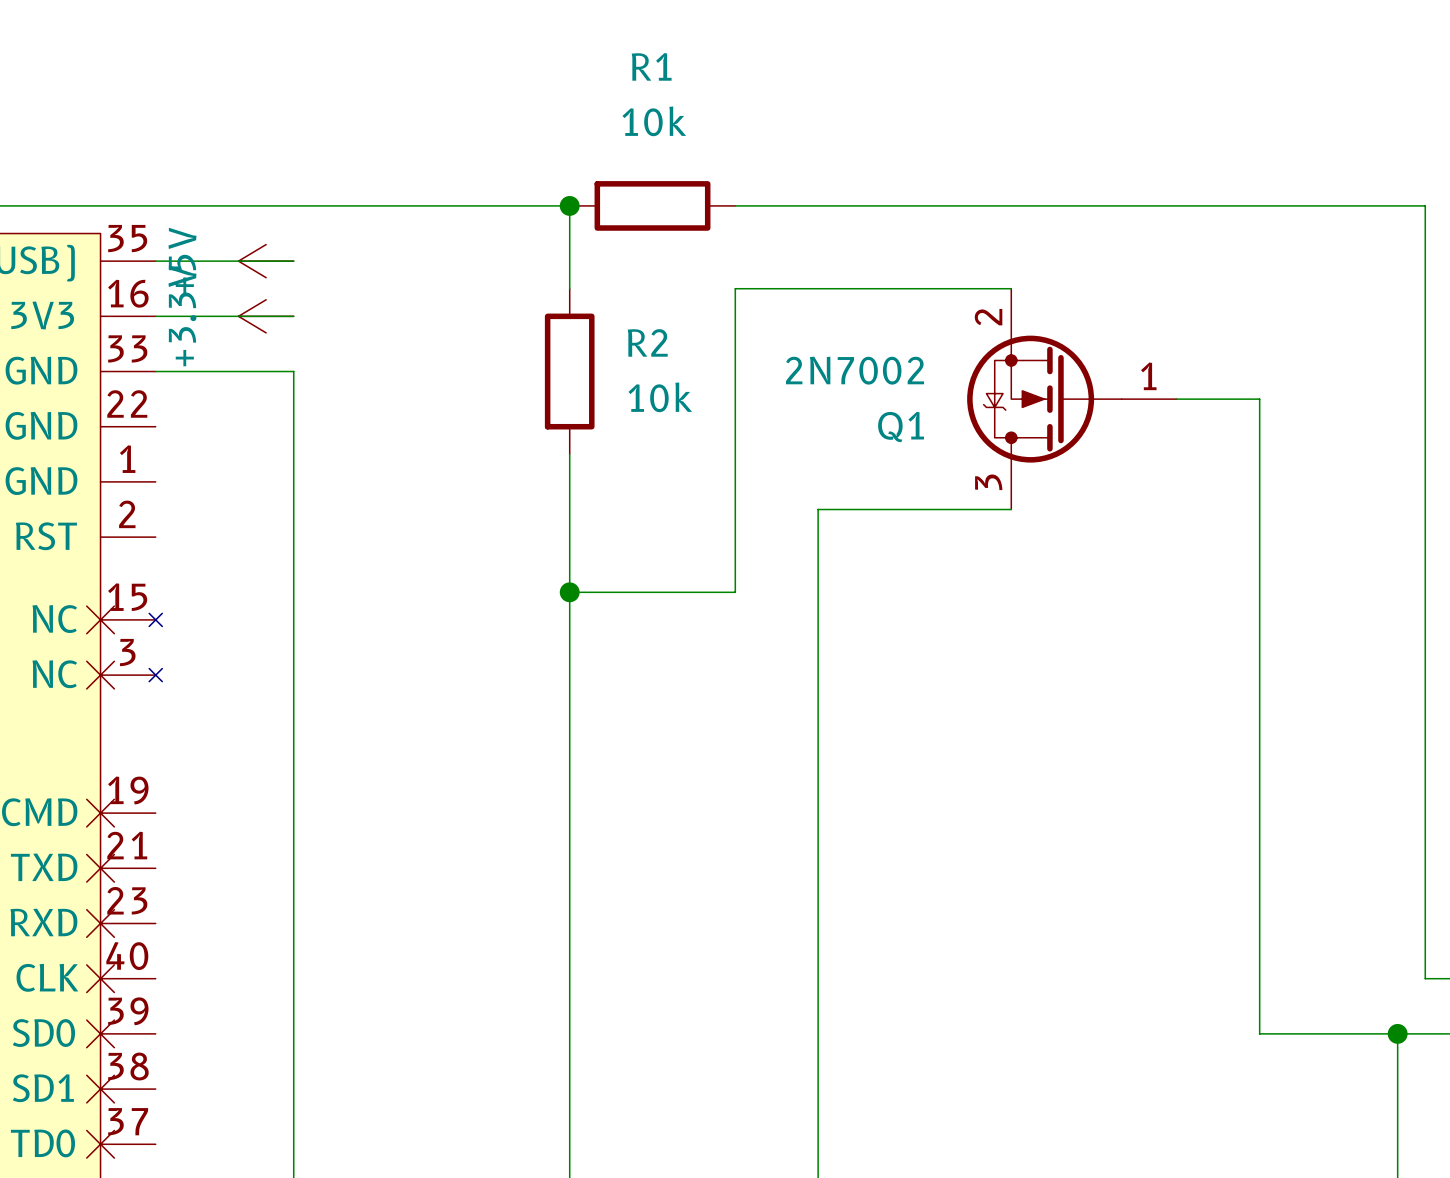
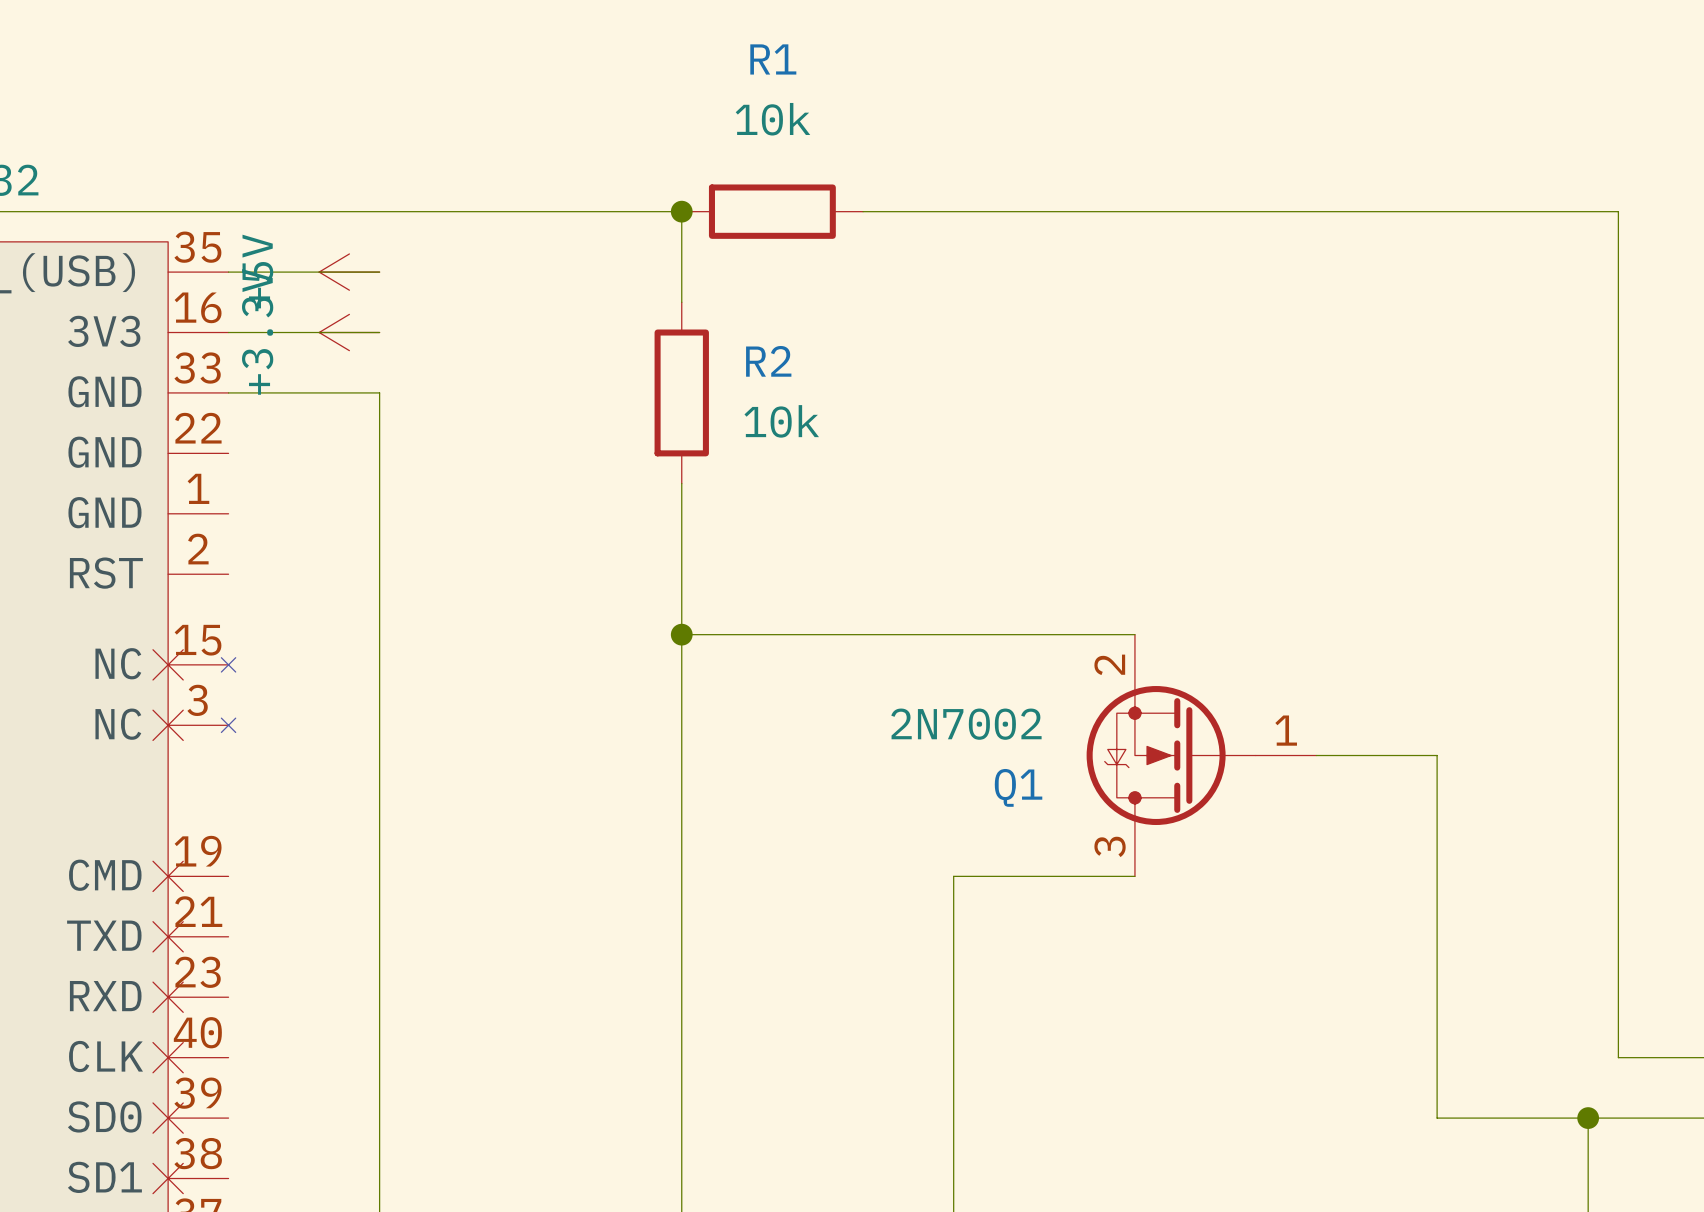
wire: (1011, 288) (735, 288) (735, 592) -> (1134, 634) (863, 634)
Q1 position: (1072, 399) -> (1201, 755)
wire: (1176, 399) (1259, 399) (1259, 702) -> (1316, 755) (1437, 755)
wire: (1011, 509) (818, 509) (818, 813) -> (1134, 876) (953, 876)

